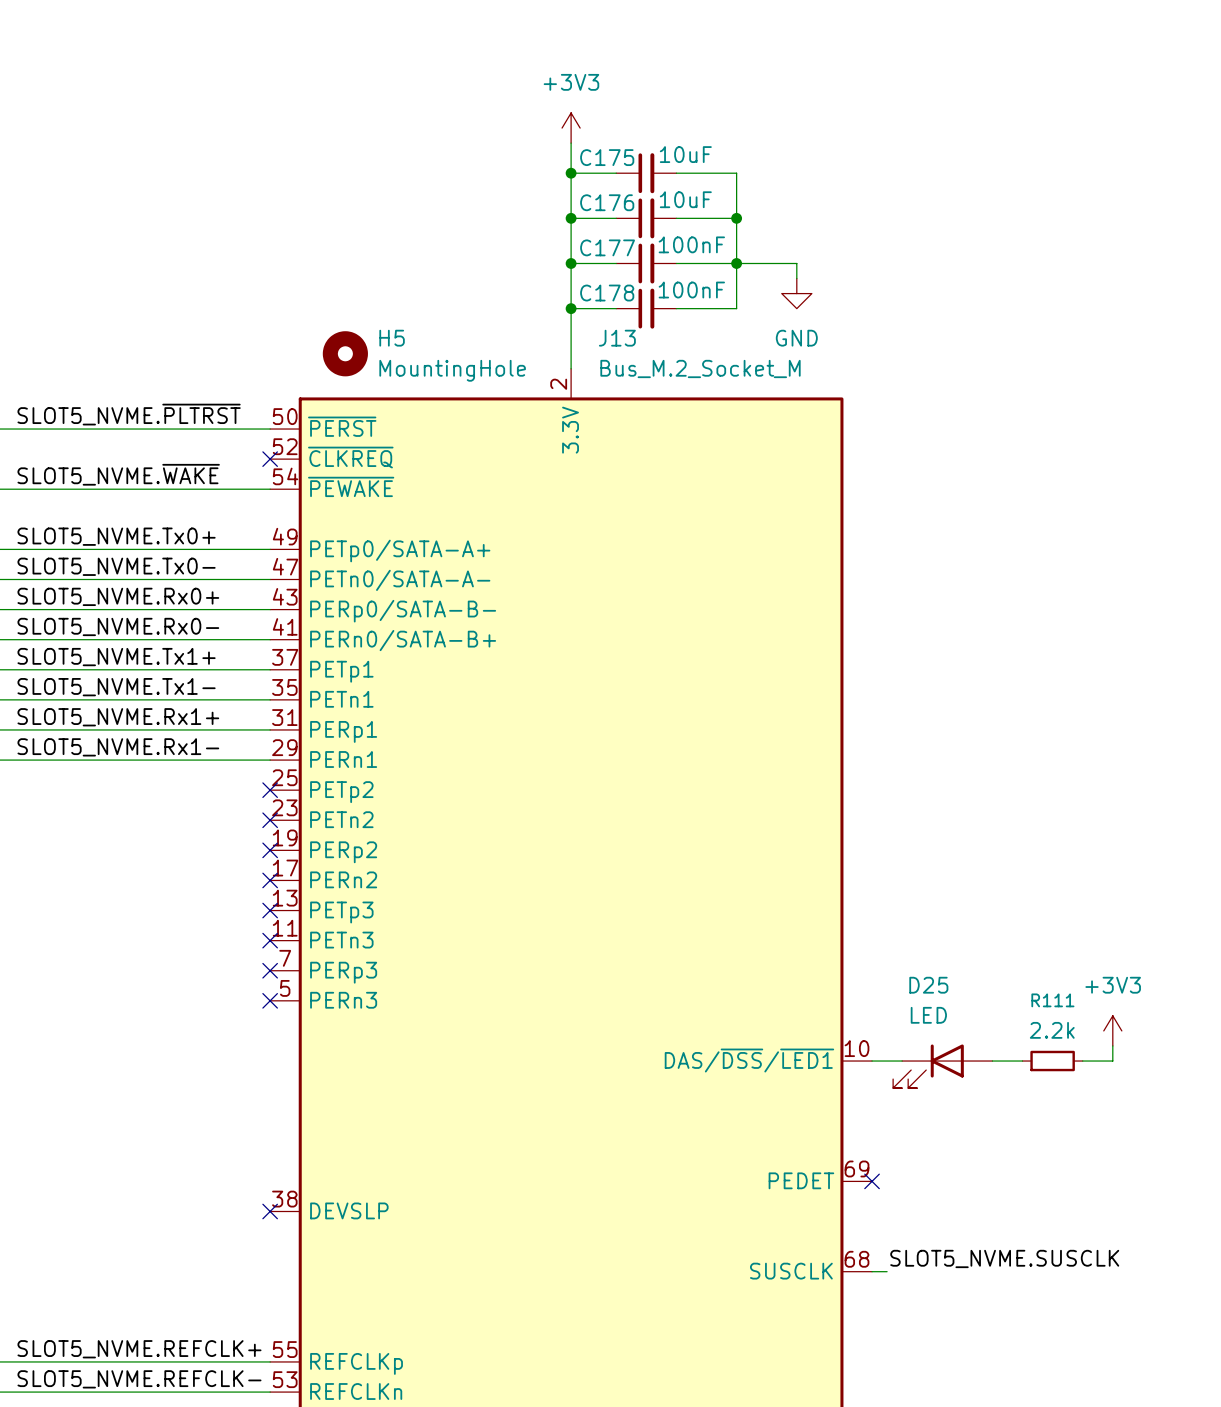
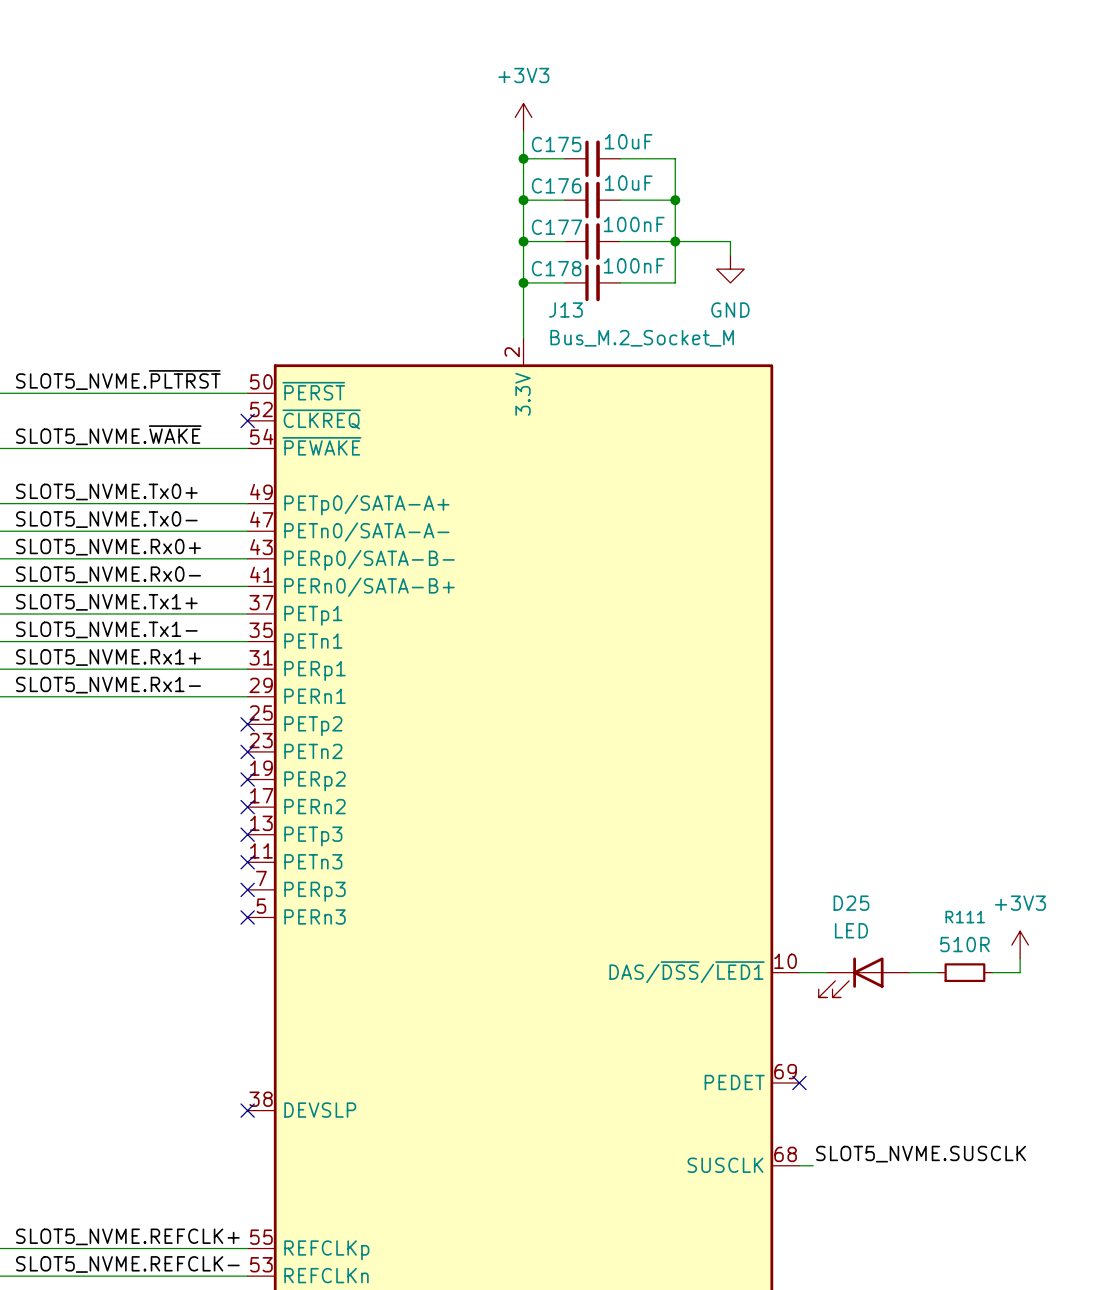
H5: MountingHole (345, 353) -> none
R111 value: 2.2k (1052, 1030) -> 510R (964, 944)

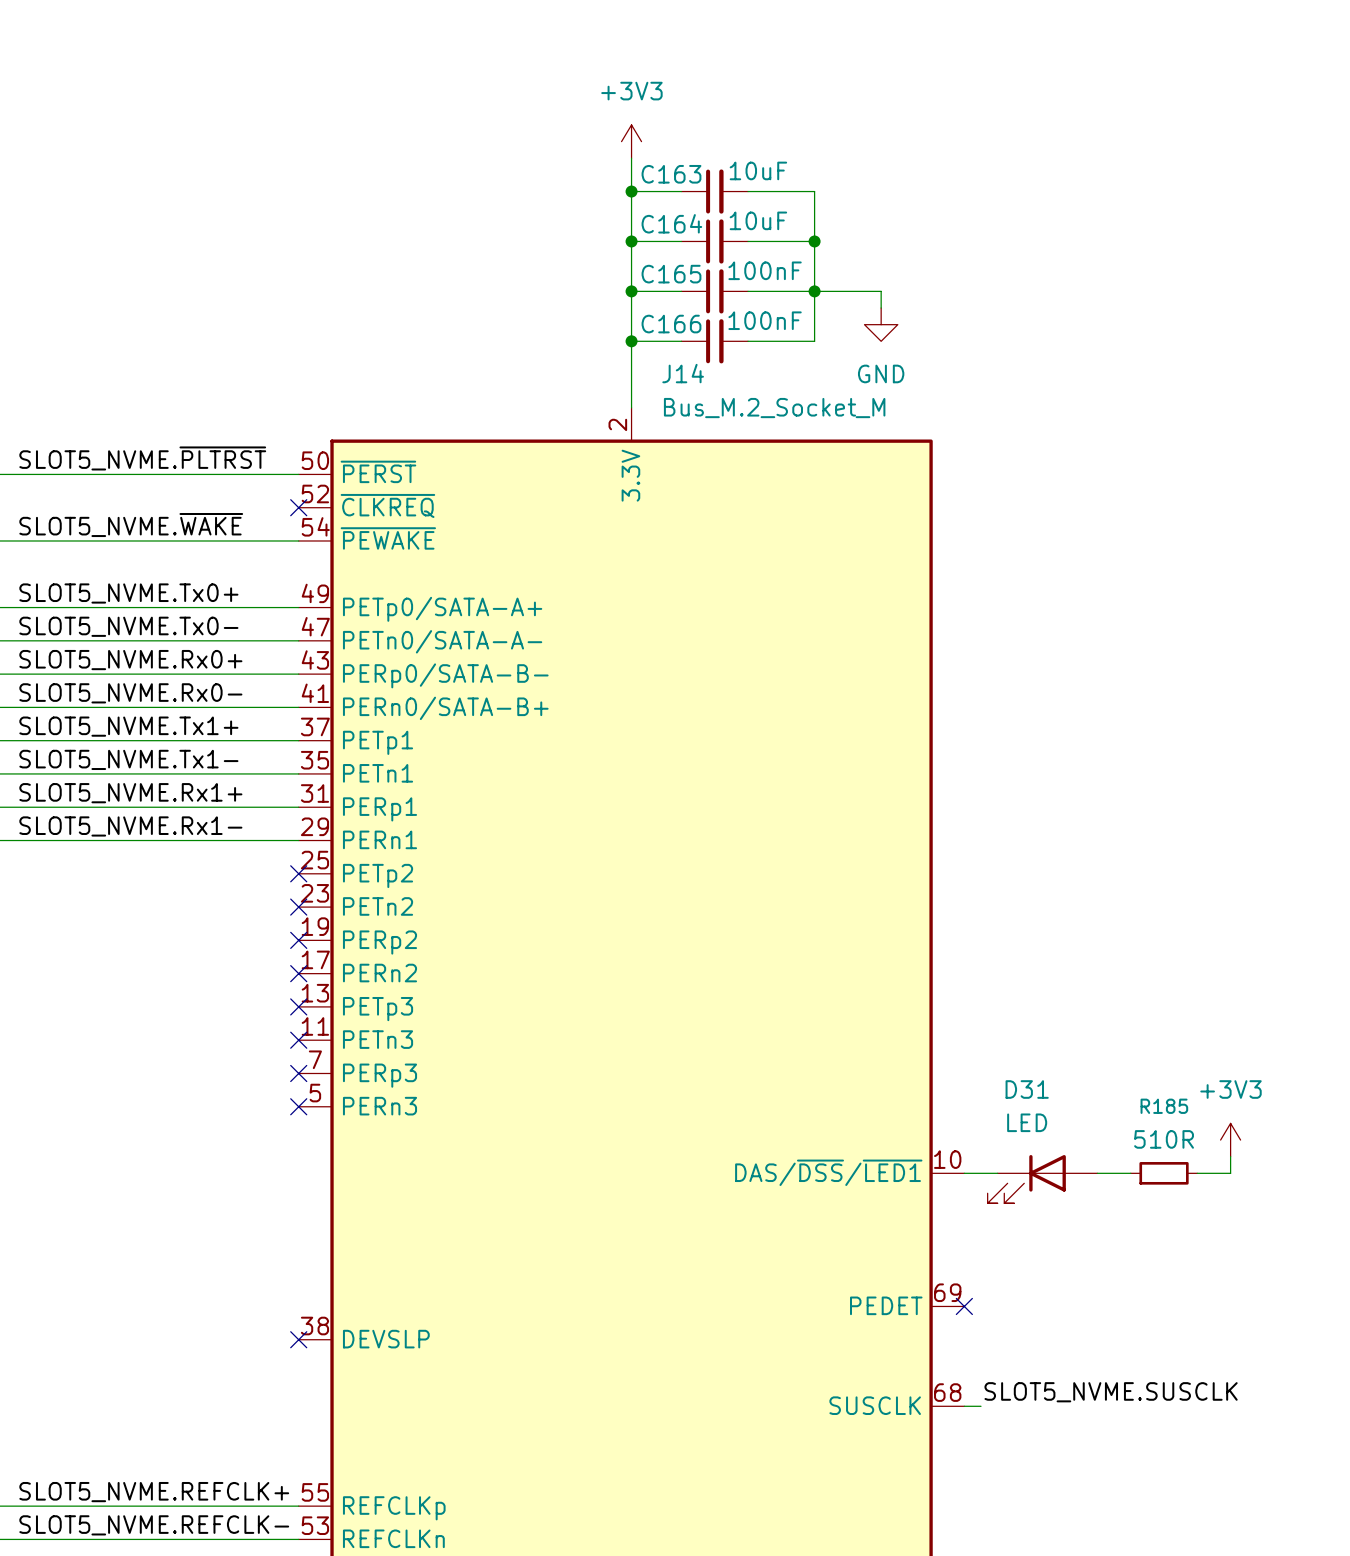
C175 name: C175 (556, 144) -> C163 (671, 174)
C176 name: C176 (556, 185) -> C164 (671, 223)
C177 name: C177 (556, 227) -> C165 (671, 274)
C178 name: C178 (556, 268) -> C166 (671, 324)
J13 name: J13 (565, 310) -> J14 (683, 373)
D25 name: D25 (851, 903) -> D31 (1027, 1089)
R111 name: R111 (965, 917) -> R185 (1164, 1106)

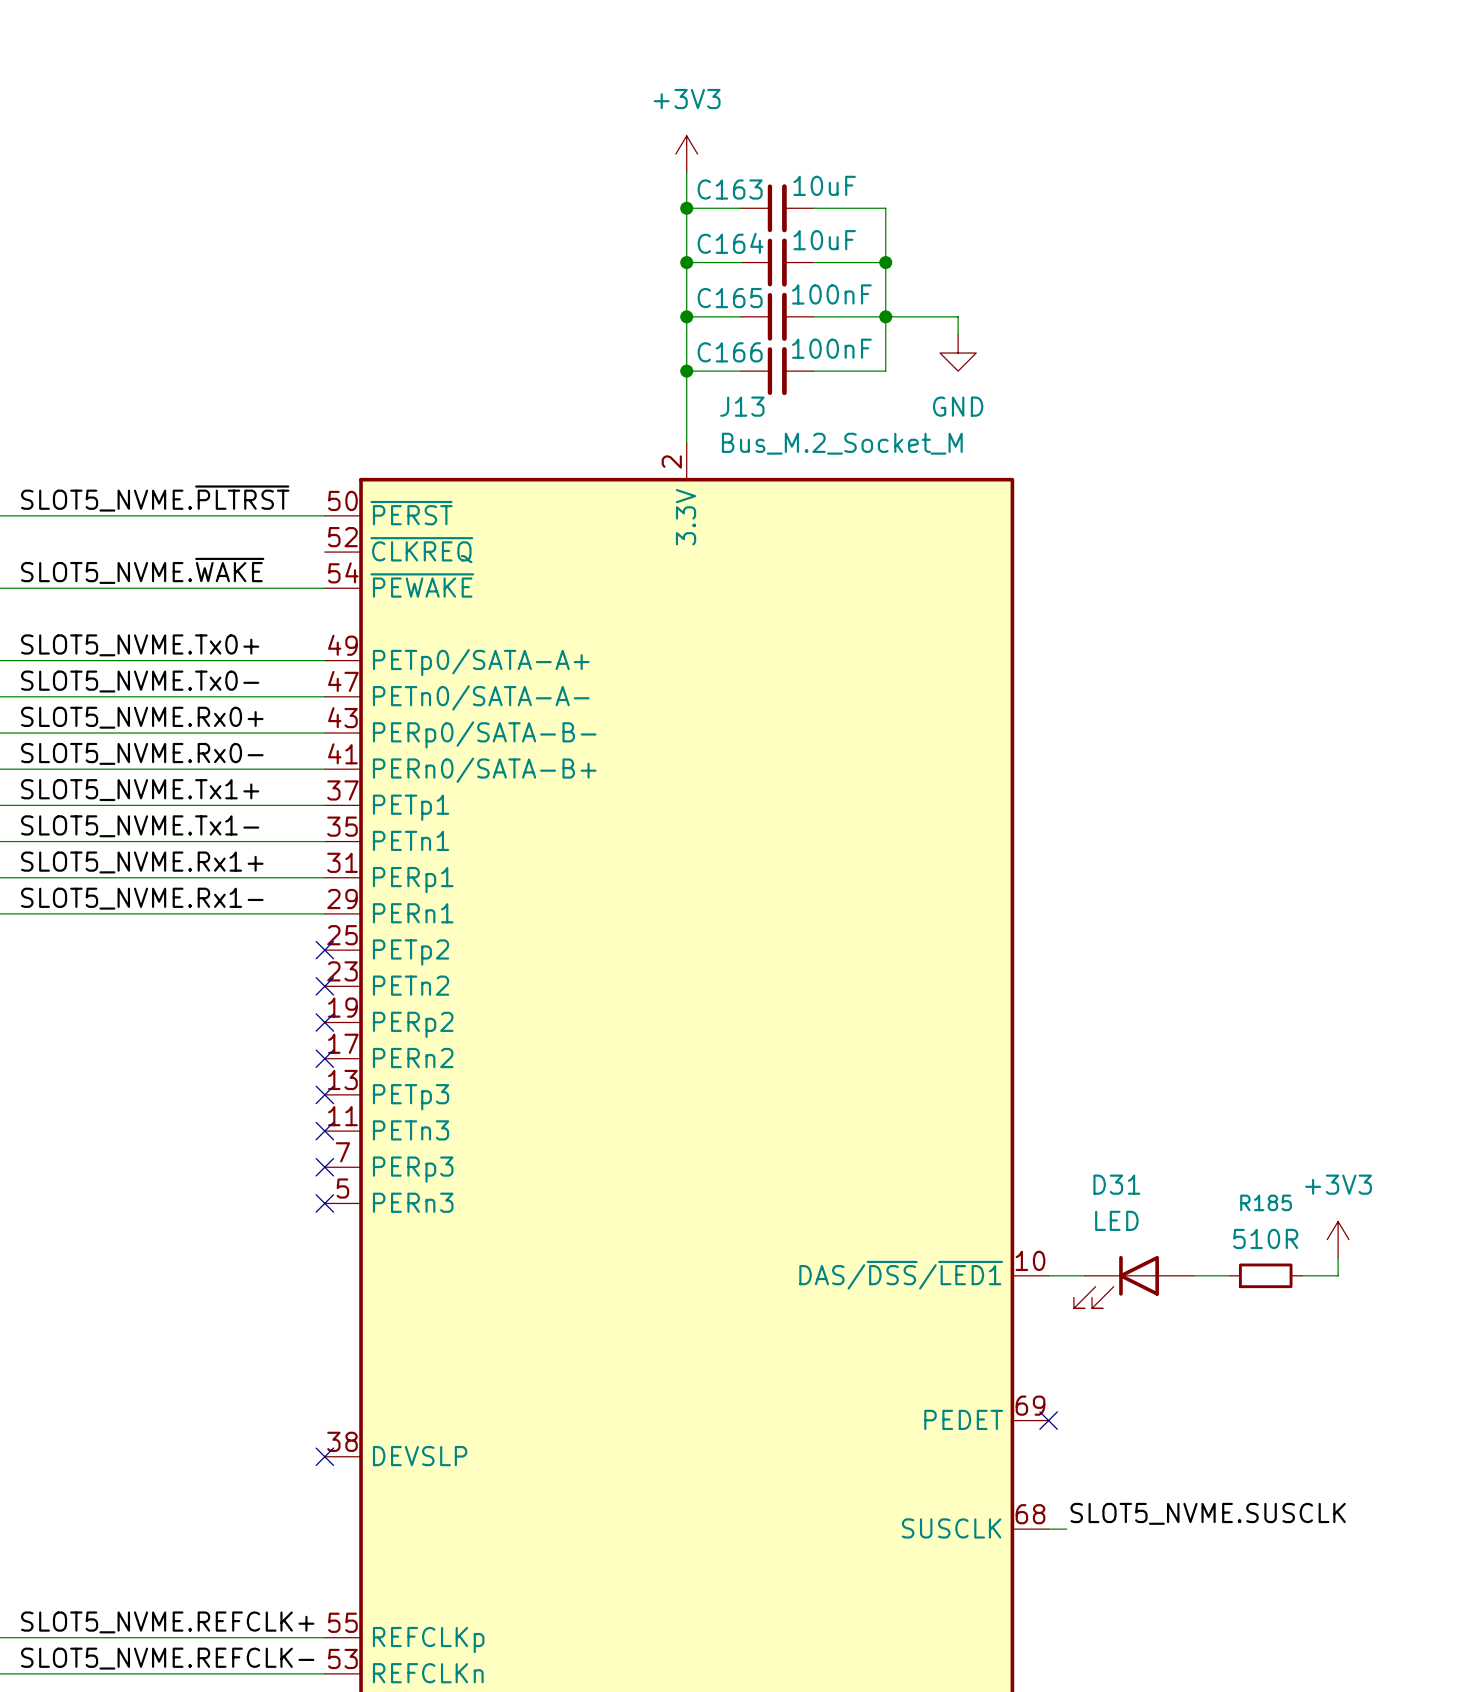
J14 name: J14 (683, 373) -> J13 (742, 406)
no-connect mark: (298, 507) -> none

